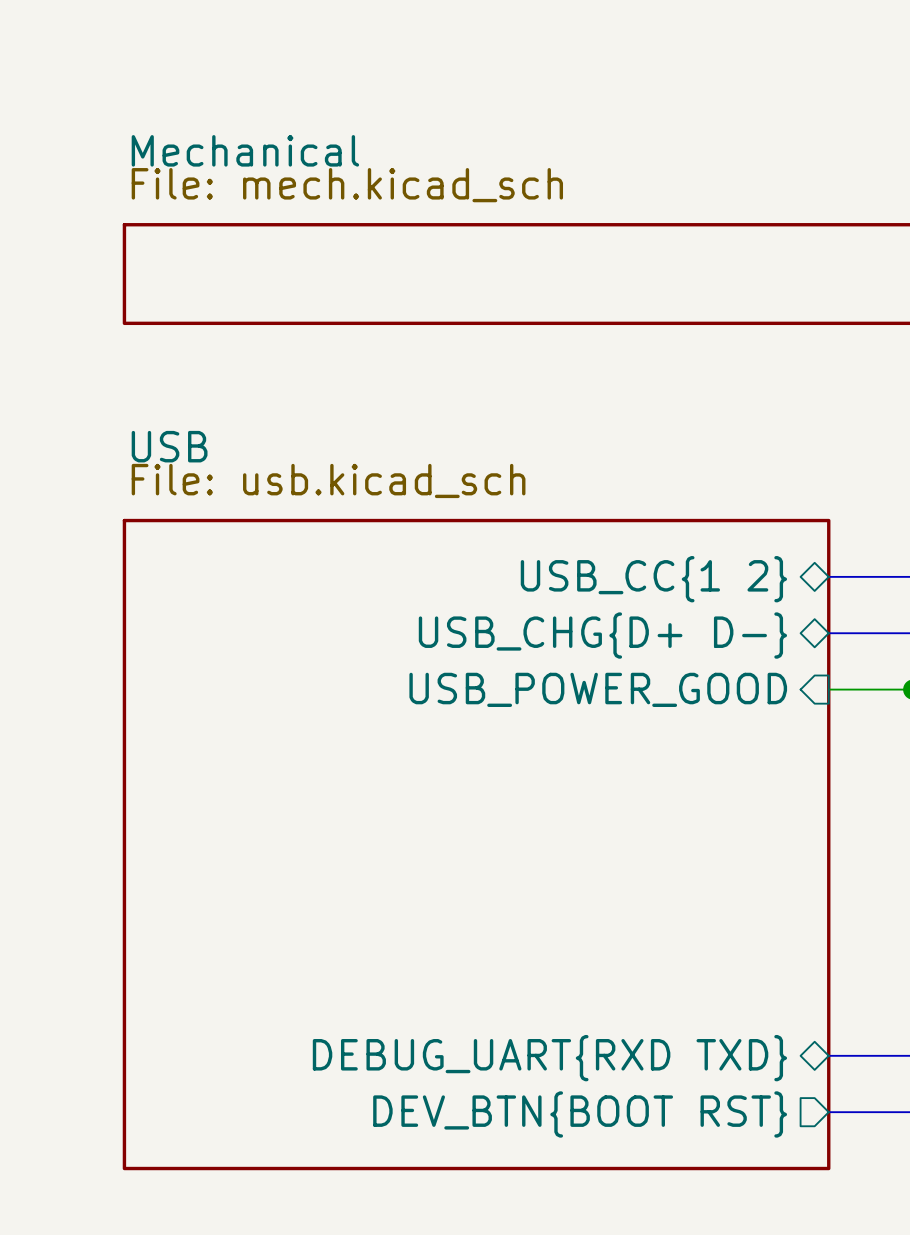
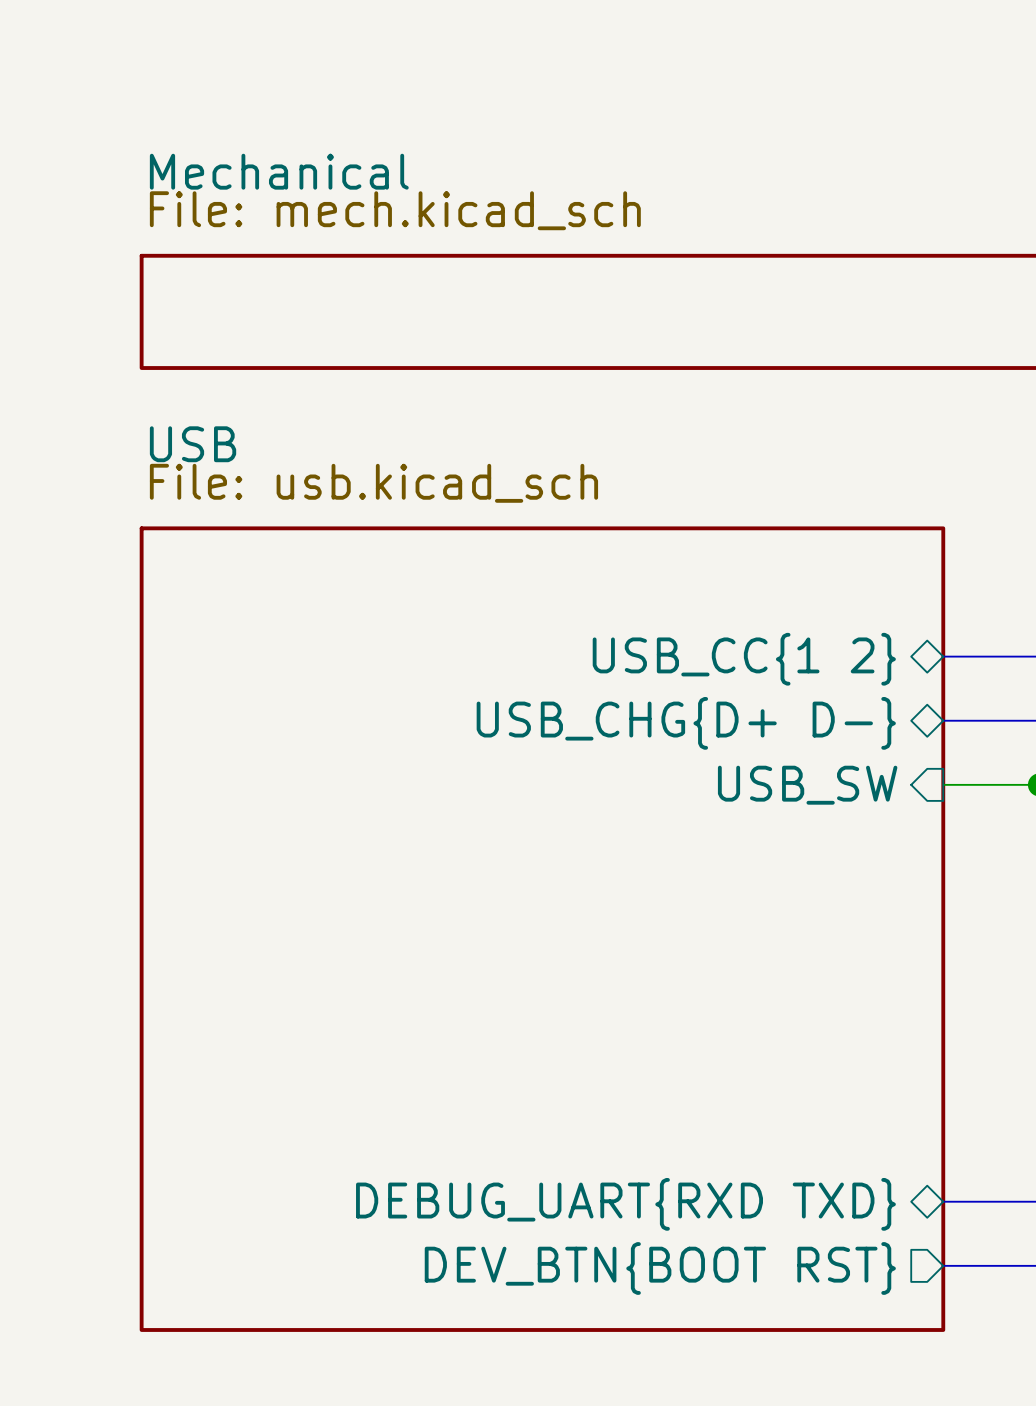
sheet pin: USB_POWER_GOOD (598, 689) -> USB_SW (807, 785)
sheet USB: none -> File: usb.kicad_sch (542, 929)
sheet USB: File: usb.kicad_sch (476, 844) -> none

